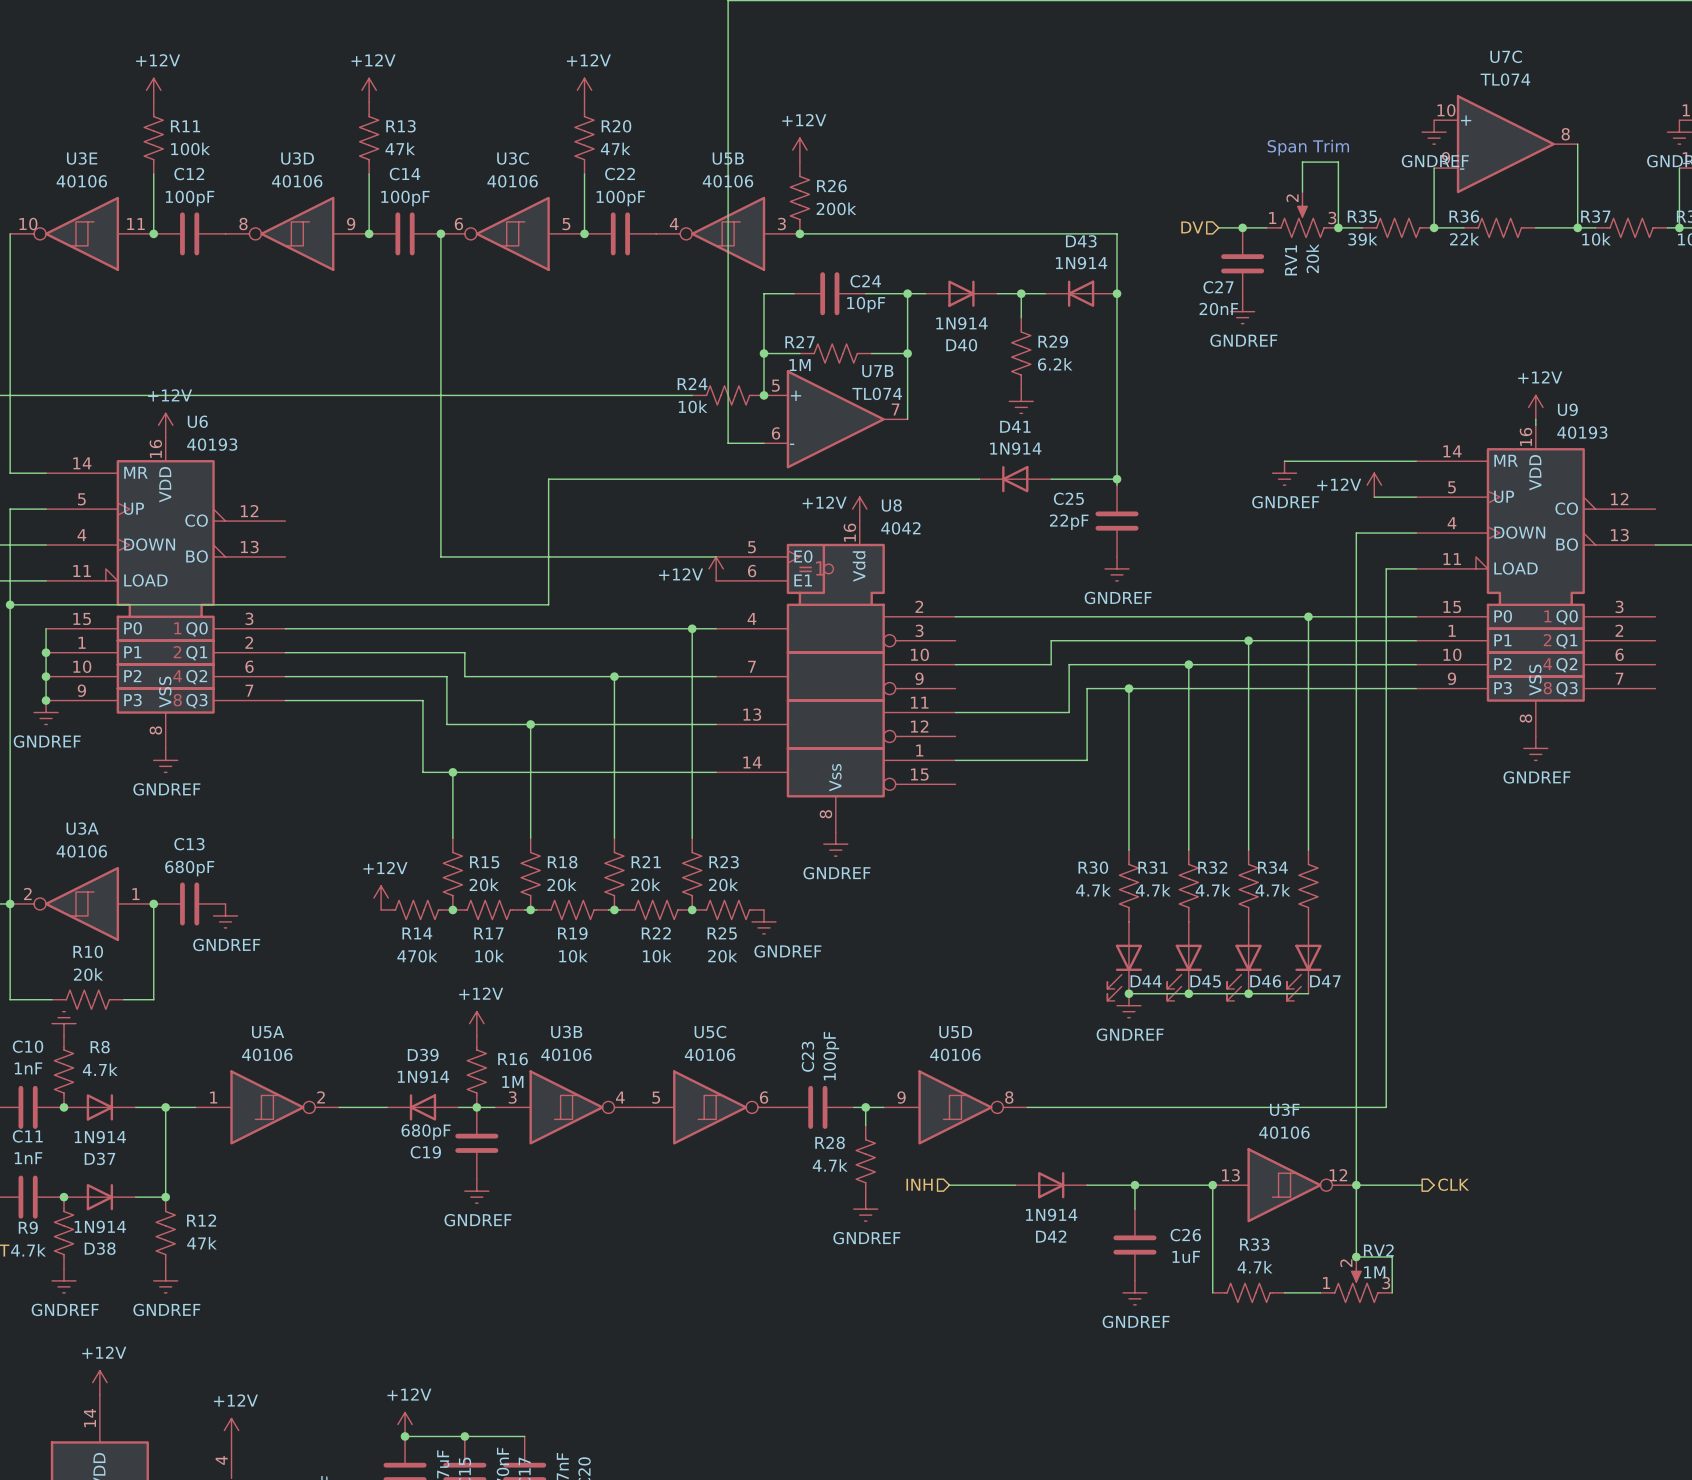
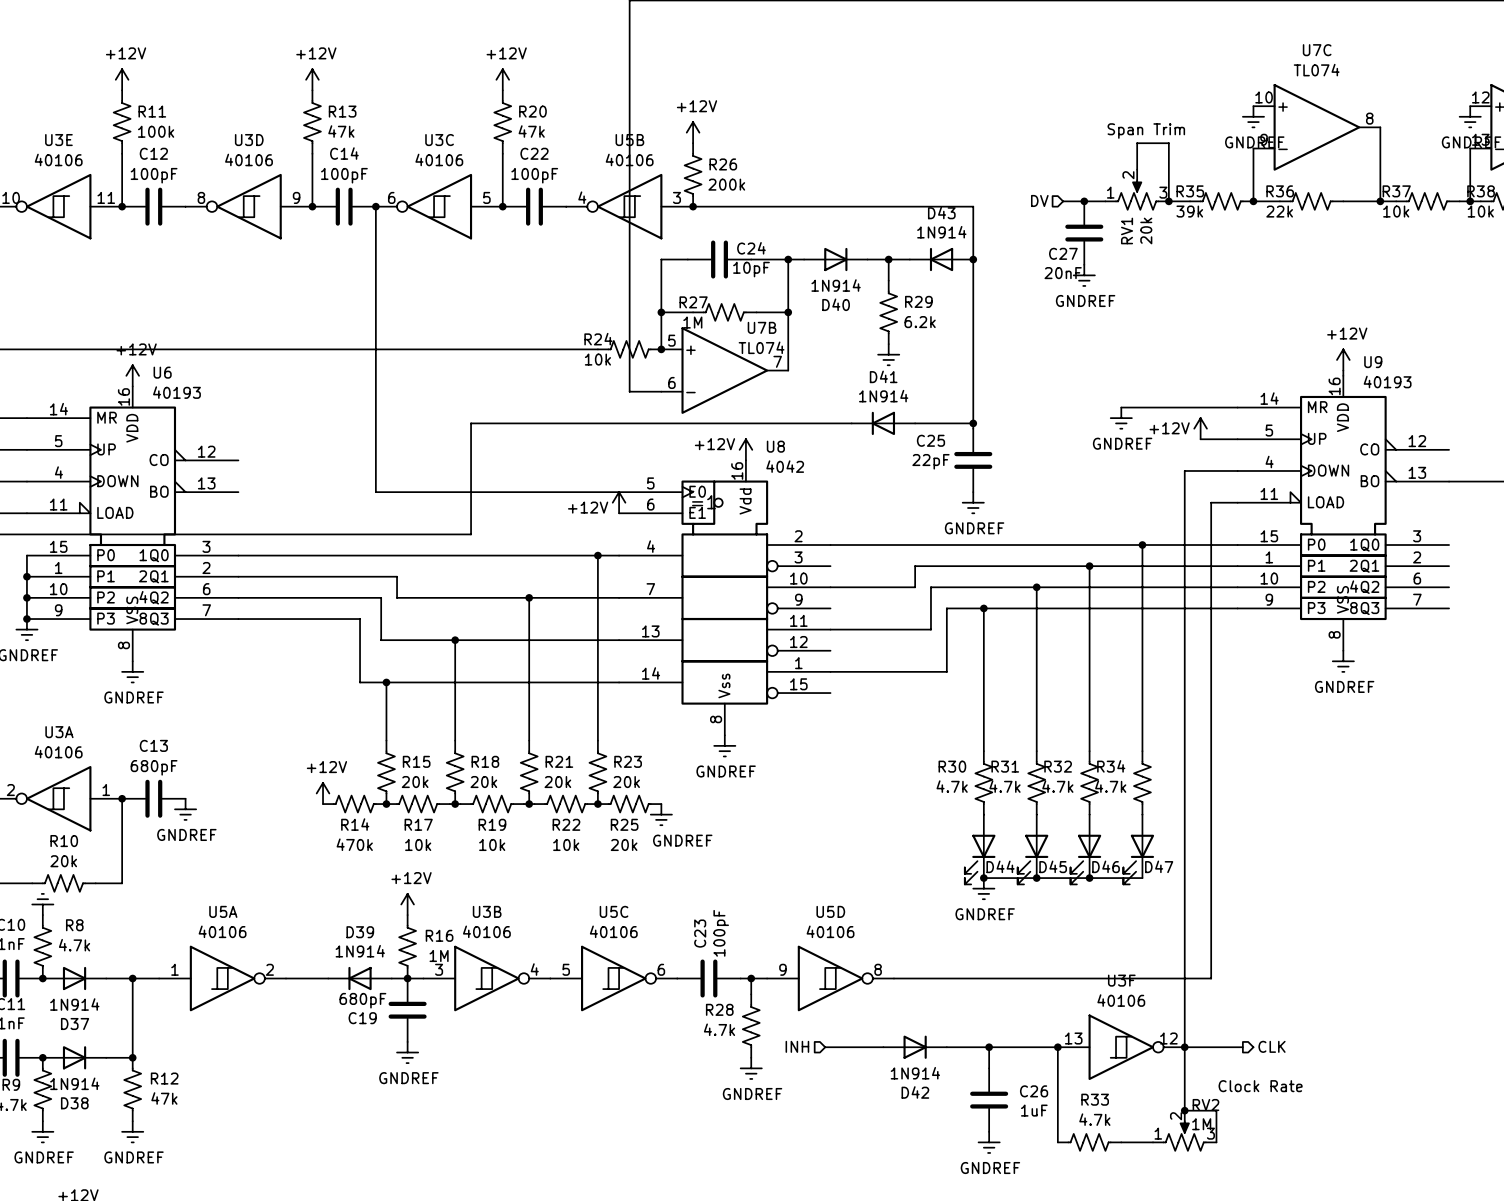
text: none -> Clock Rate (1260, 1086)

